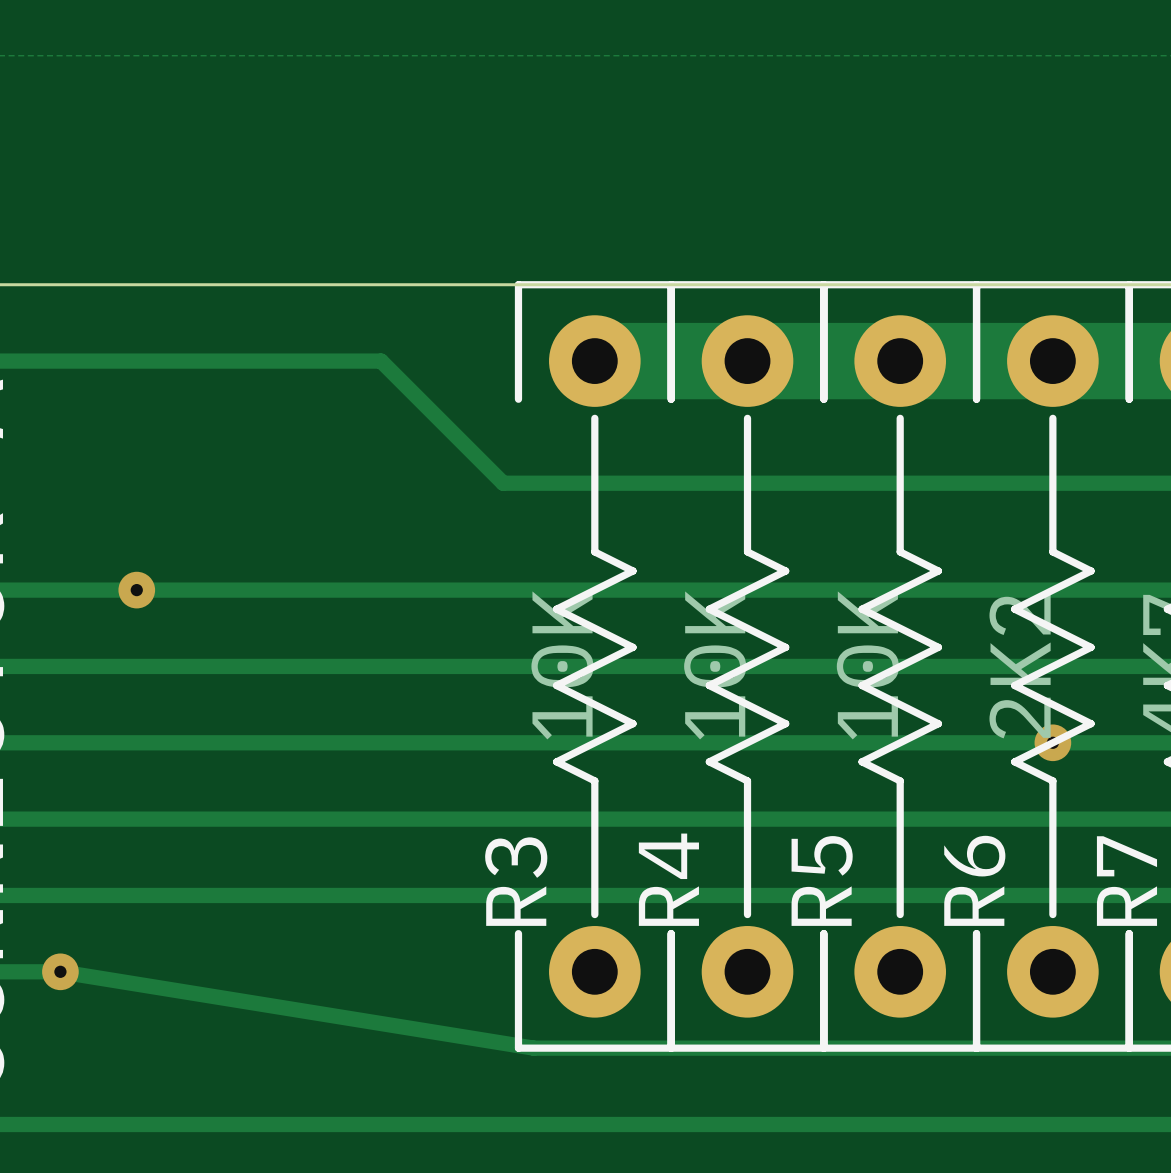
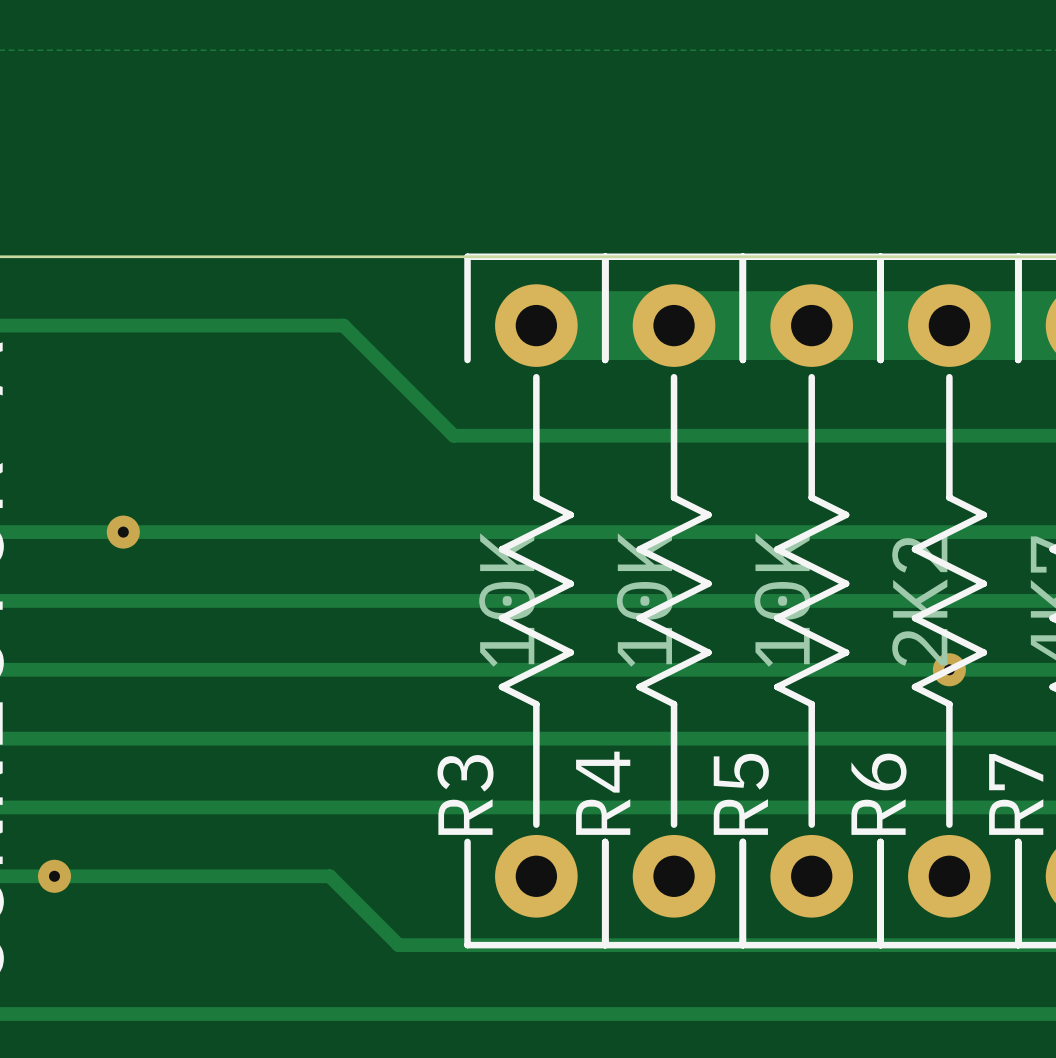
track: (60, 971) (533, 1048) -> (54, 876) (329, 876) (398, 945) (481, 945)

